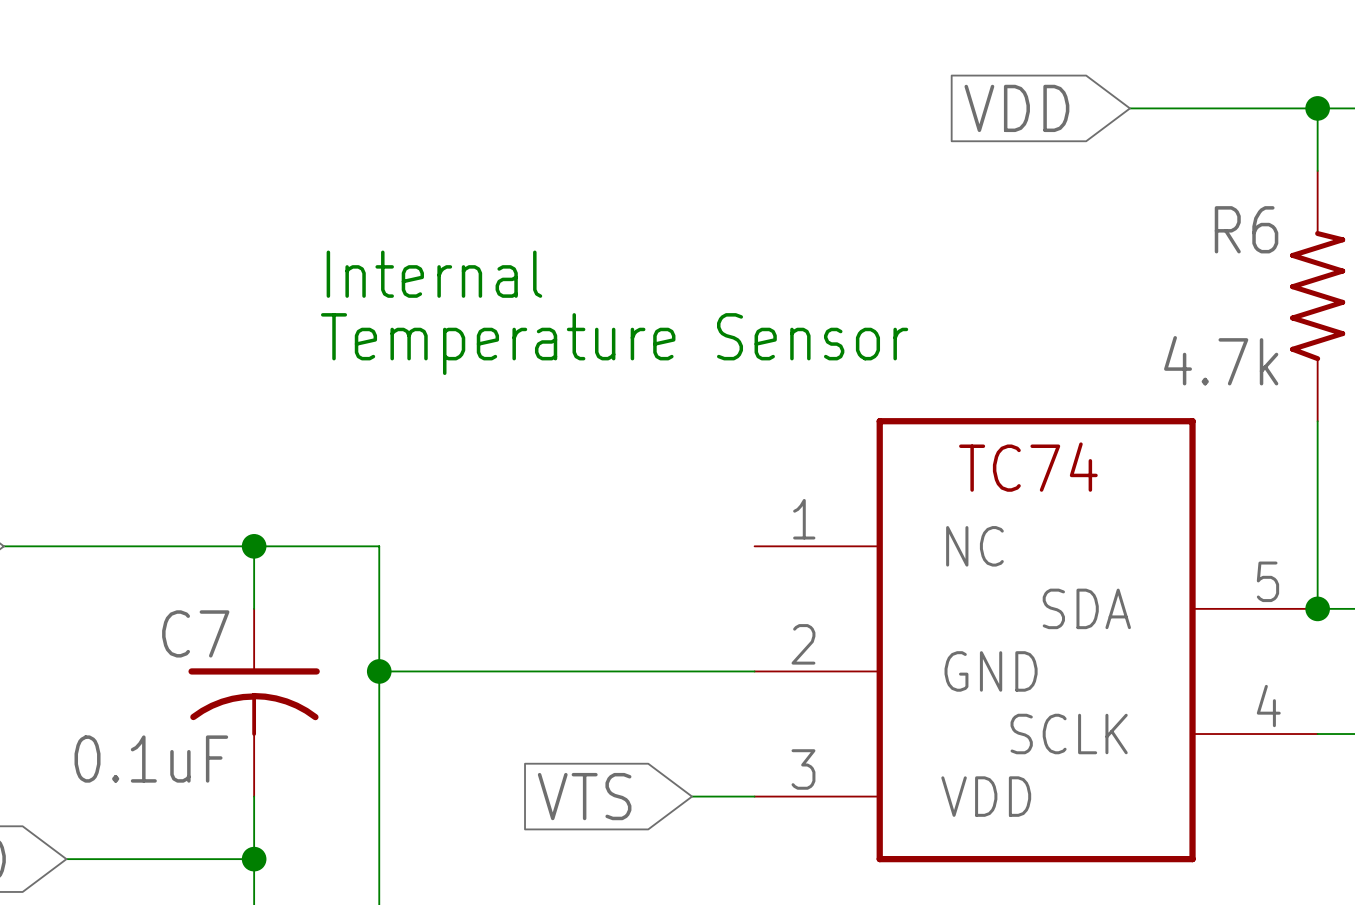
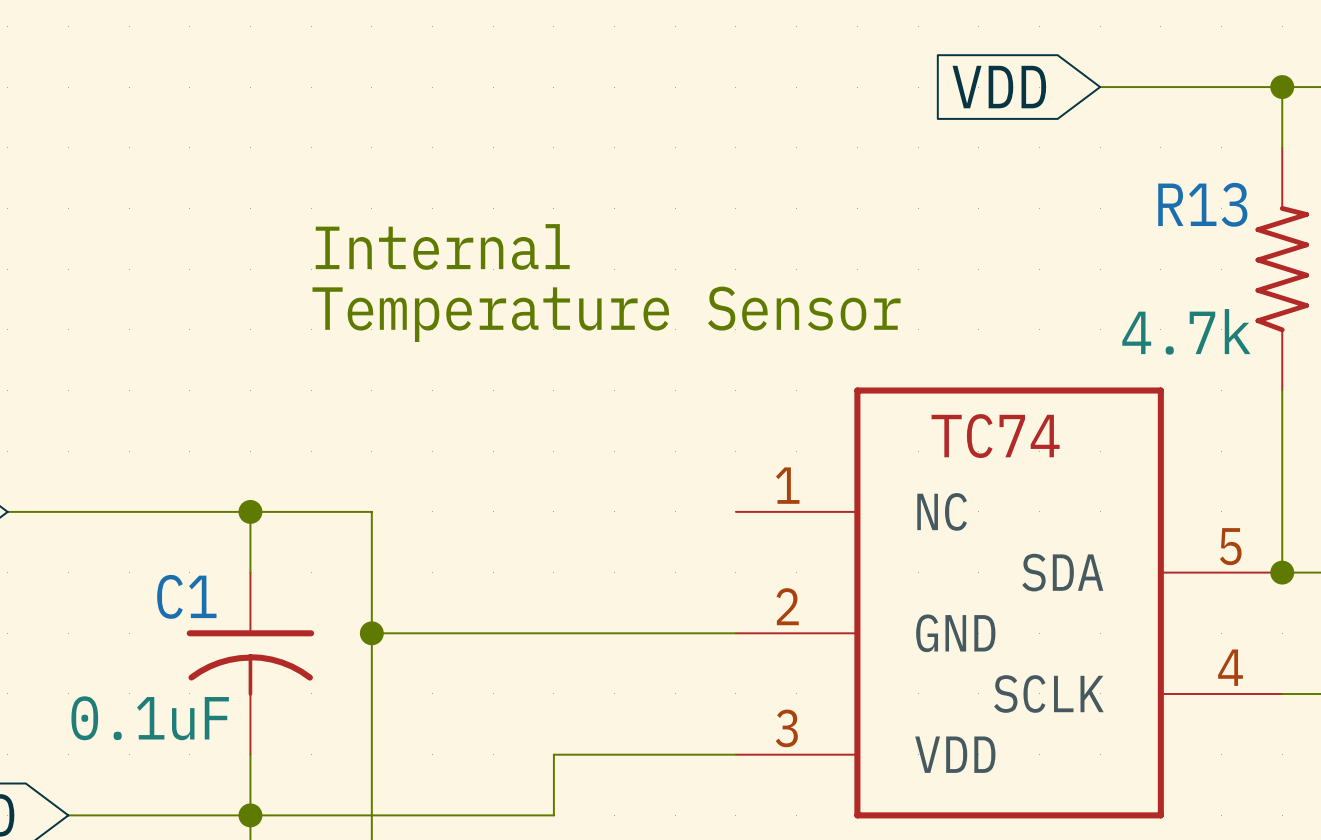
R6 name: R6 (1246, 229) -> R13 (1202, 204)
C7 name: C7 (195, 633) -> C1 (186, 596)
global label: VTS (584, 796) -> none
wire: none -> (675, 754) (553, 754) (553, 815) (250, 815)

